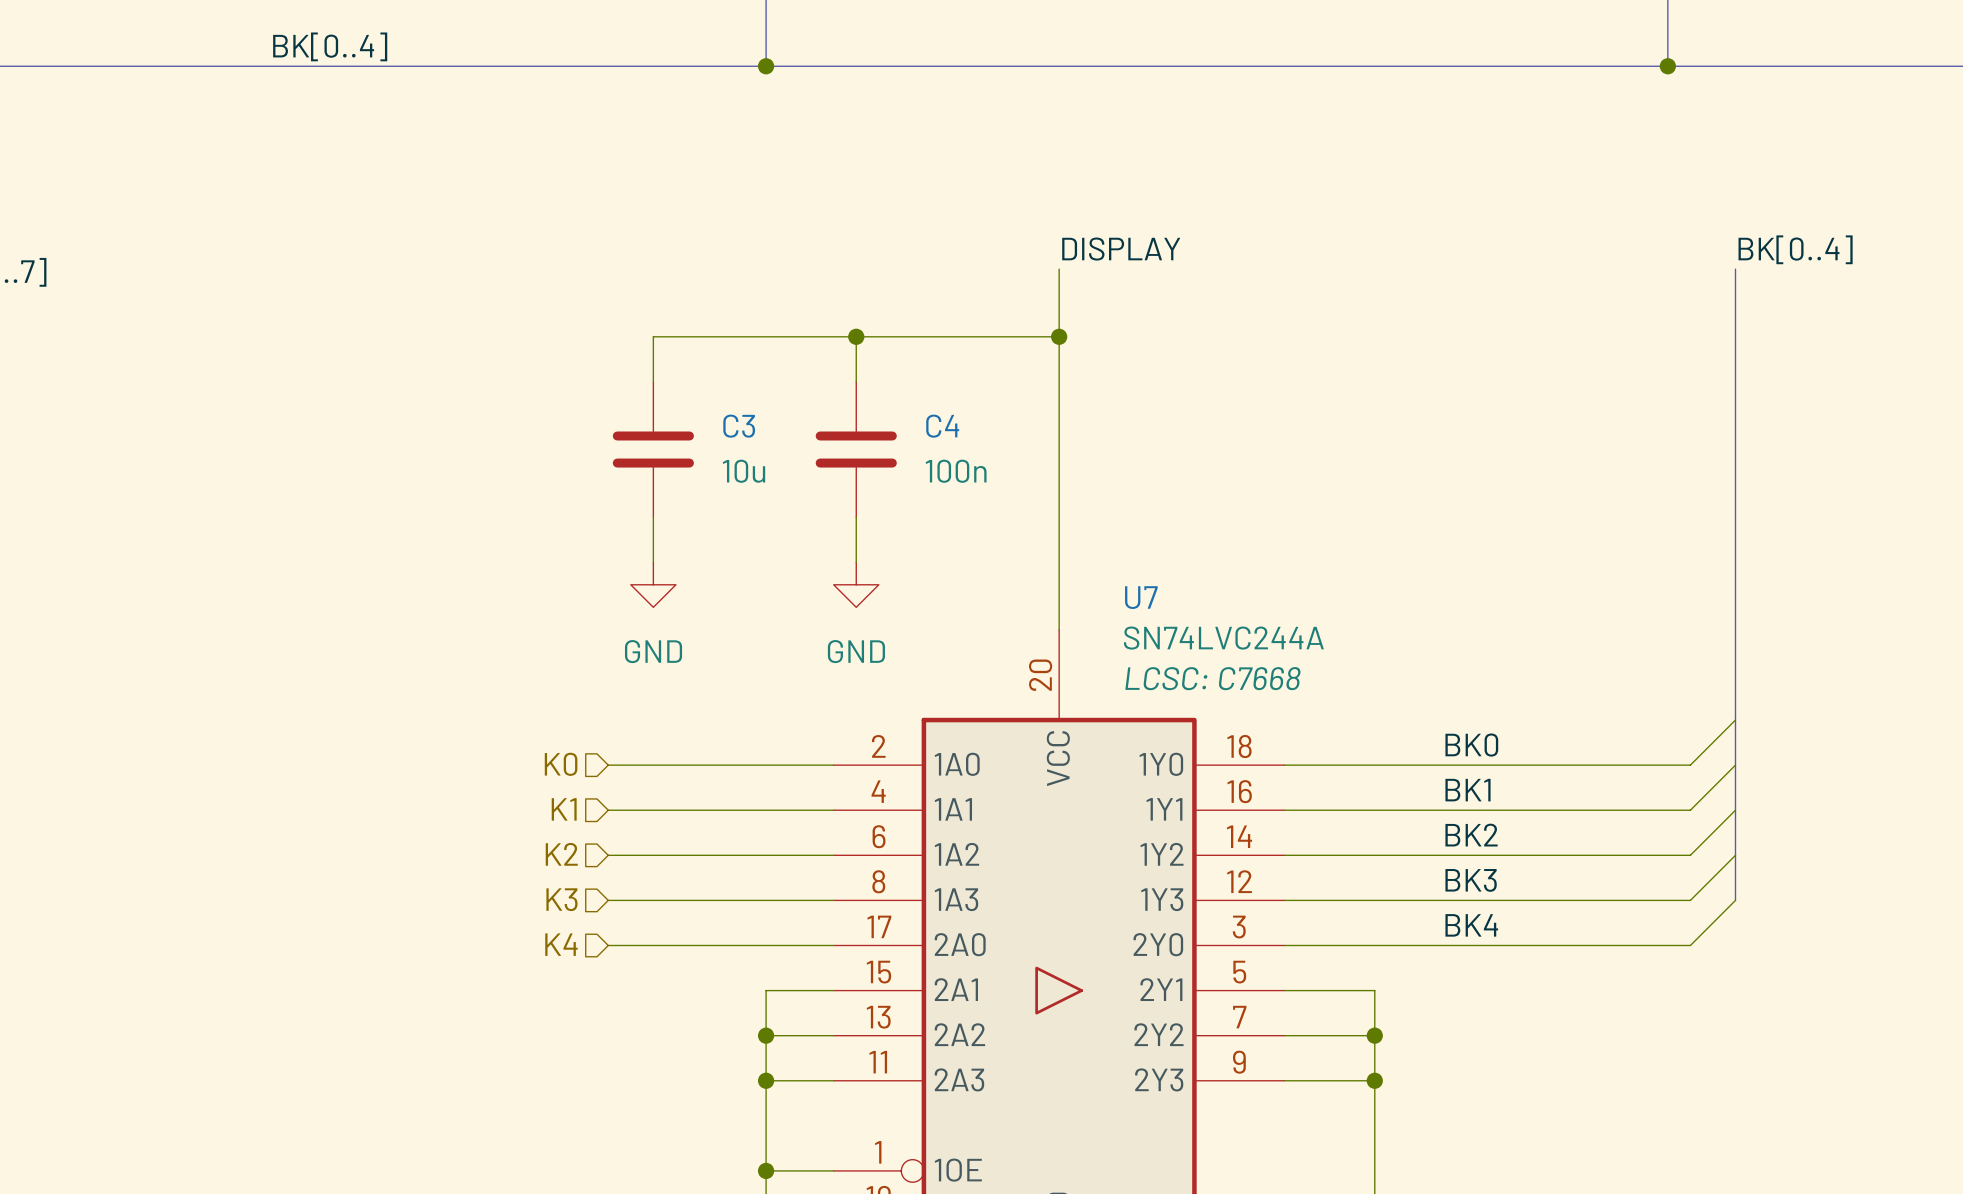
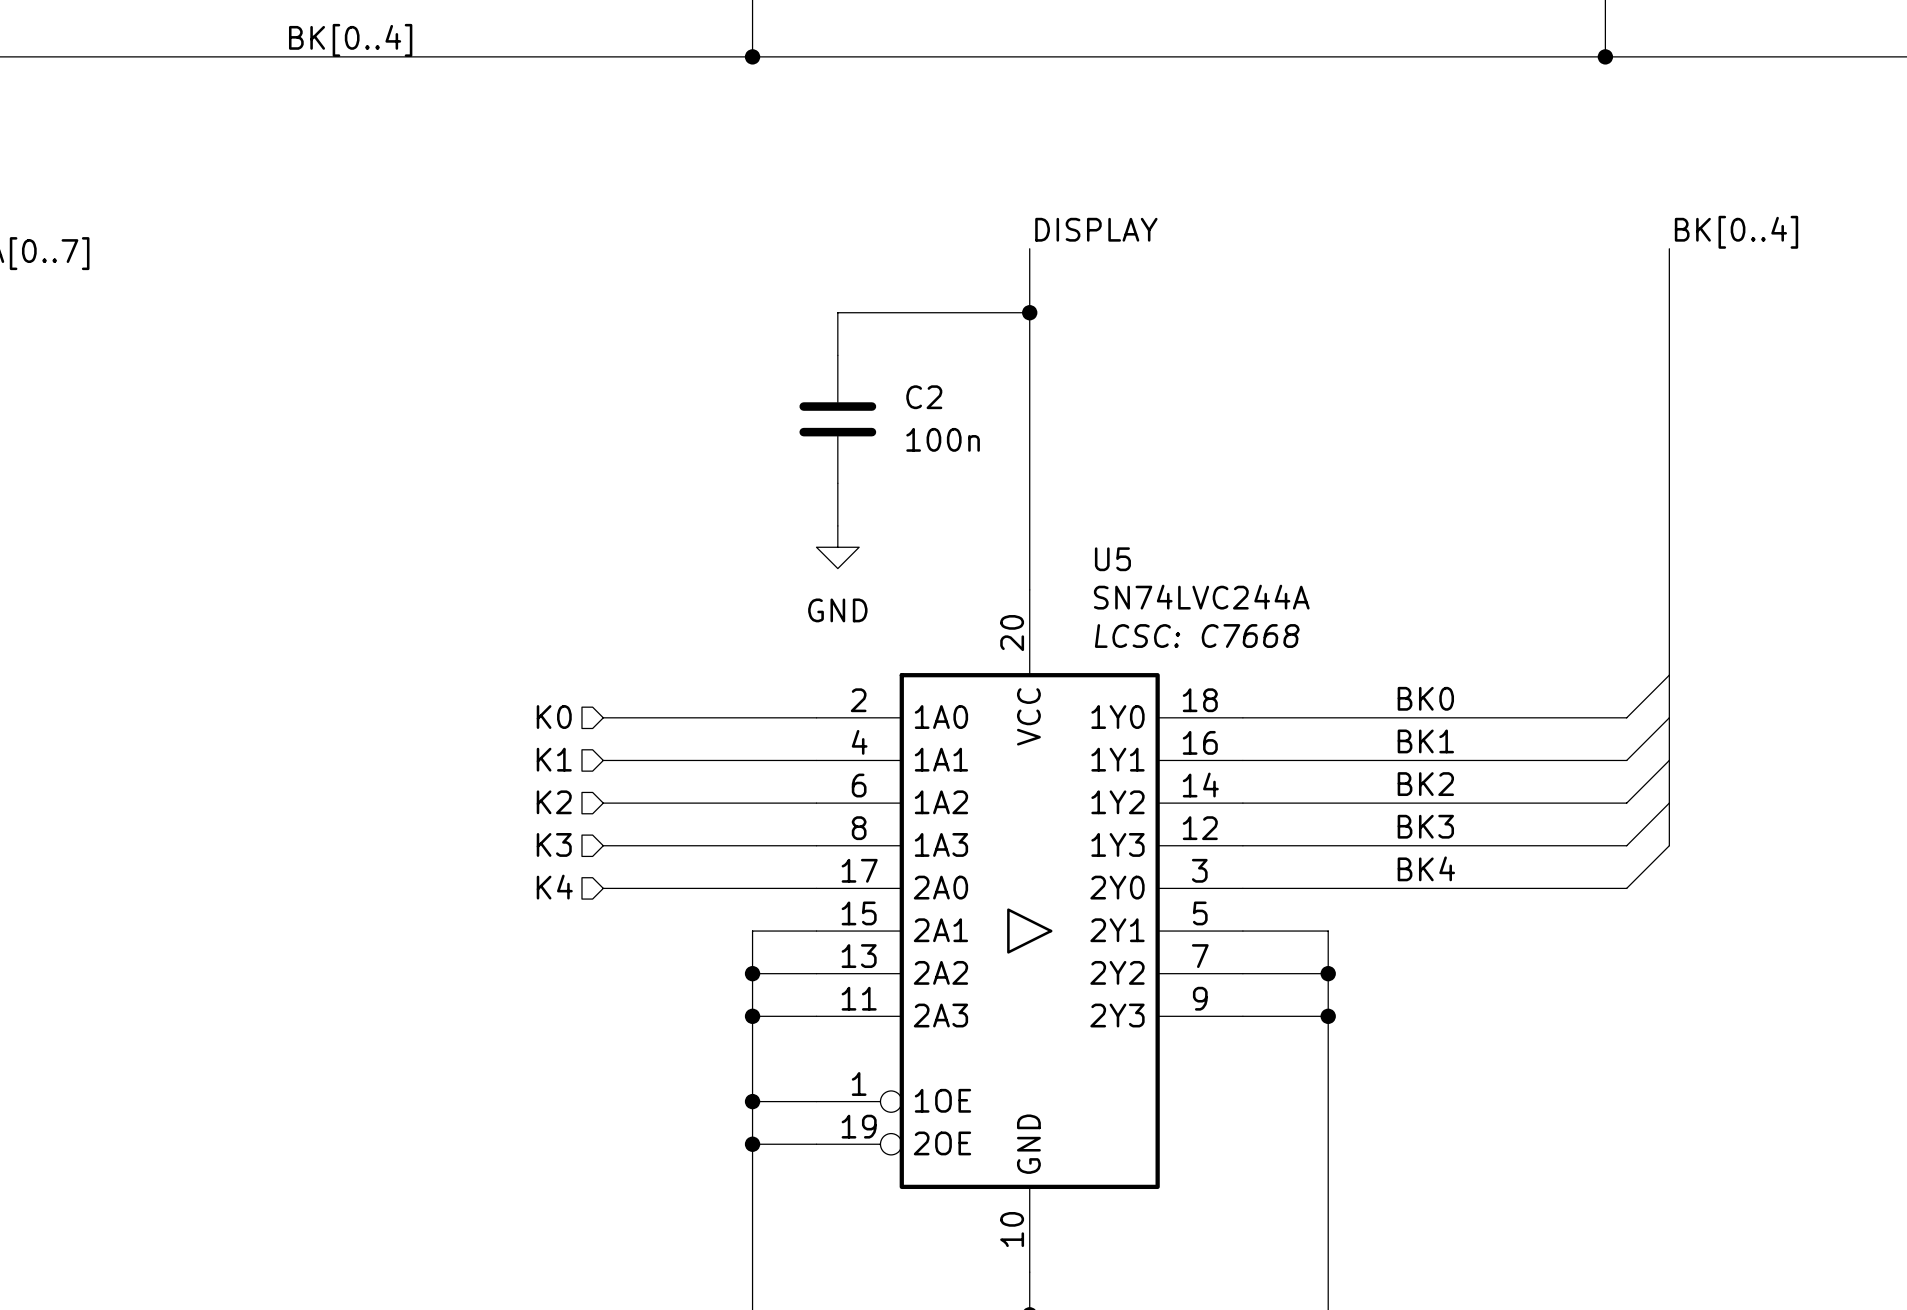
wire: (856, 336) (653, 336) (653, 381) -> none
junction: (856, 336) -> none
C4 name: C4 (942, 426) -> C2 (924, 397)
C3: 10u (653, 449) -> none
wire: (653, 517) (653, 562) -> none
power symbol: GND (653, 584) -> none
U7 name: U7 (1141, 597) -> U5 (1112, 559)

